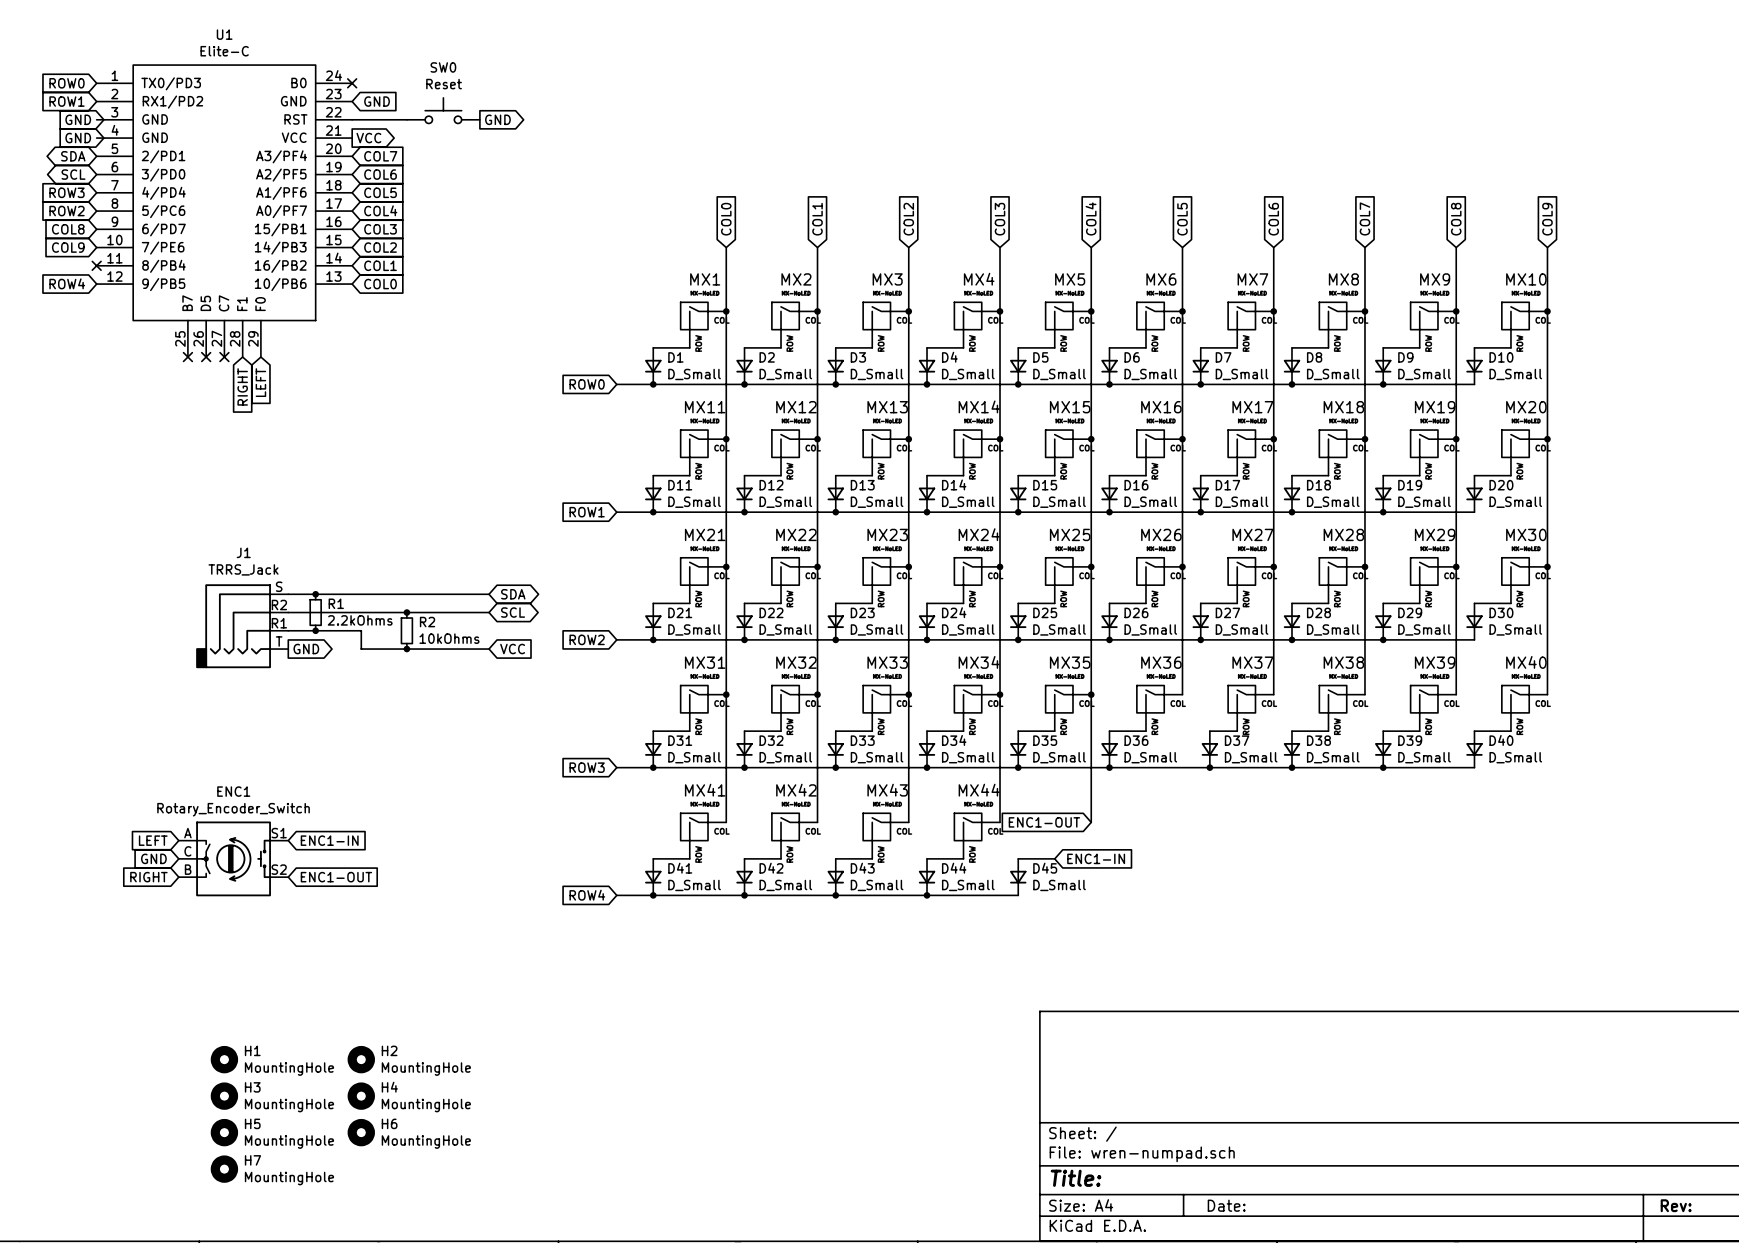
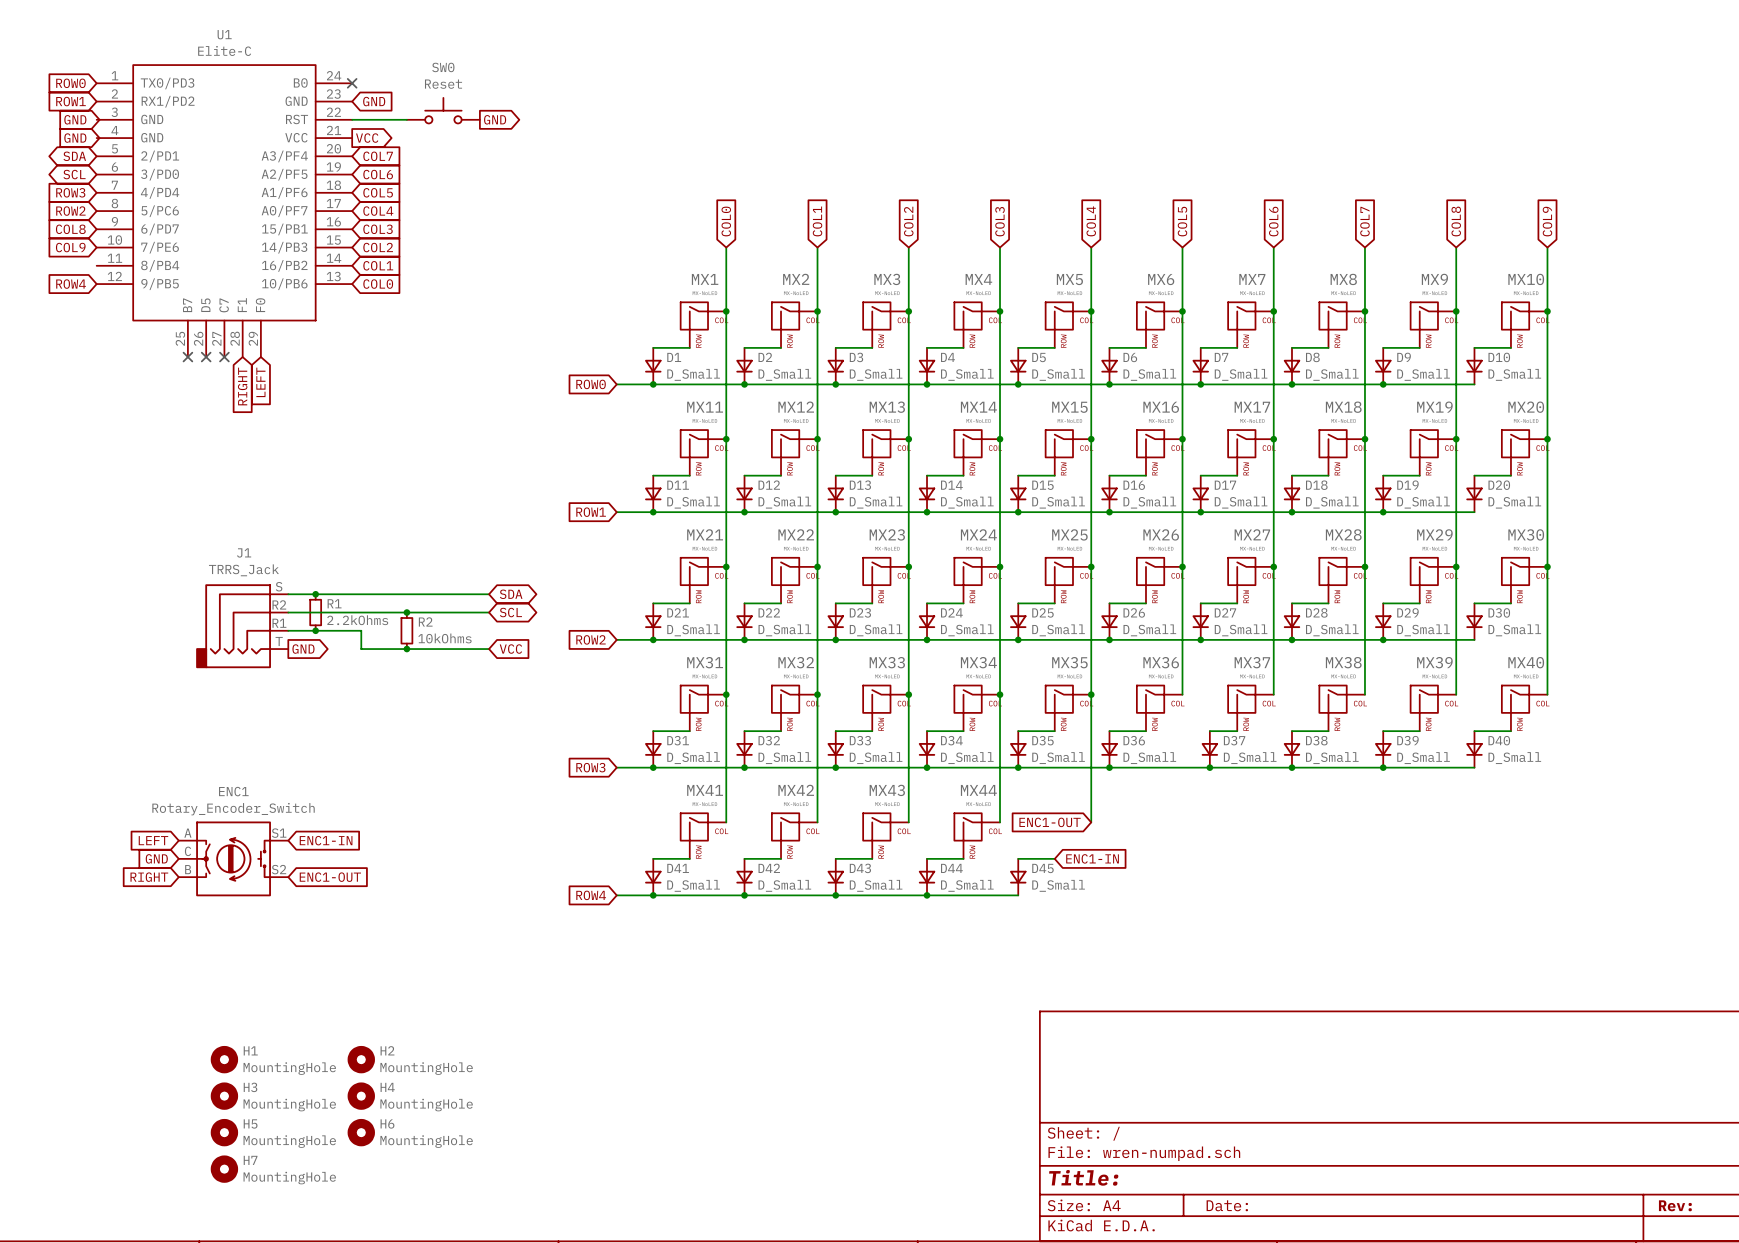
no-connect mark: (96, 265) -> none

